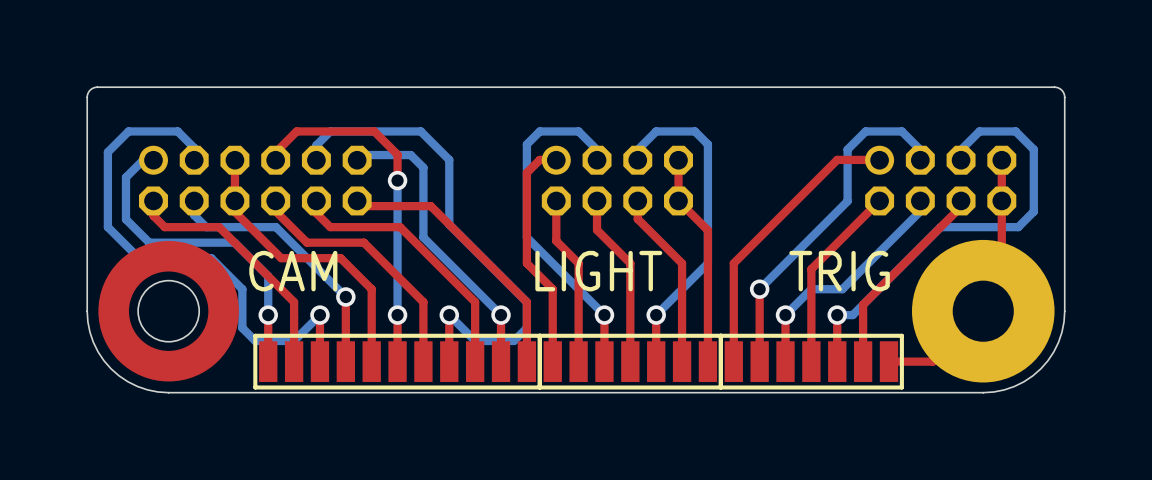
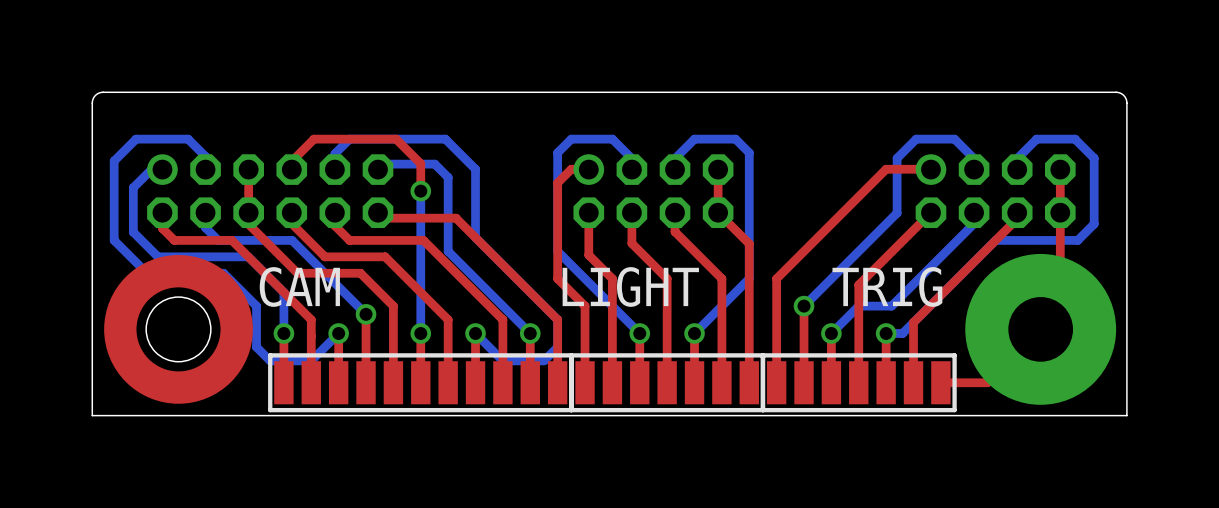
board edge: (87, 311) (93, 342) (111, 368) (137, 386) (168, 392) -> (92, 329) (92, 415) (178, 415)
board edge: (1064, 311) (1058, 342) (1040, 368) (1014, 386) (983, 392) -> (1126, 329) (1126, 415) (1040, 415)

